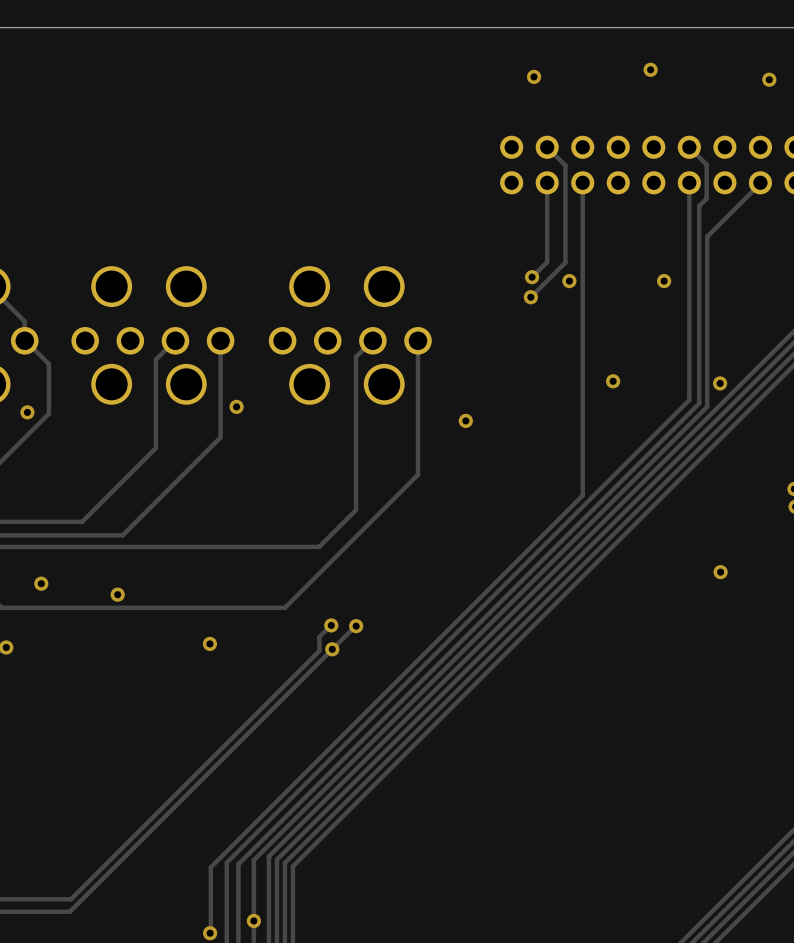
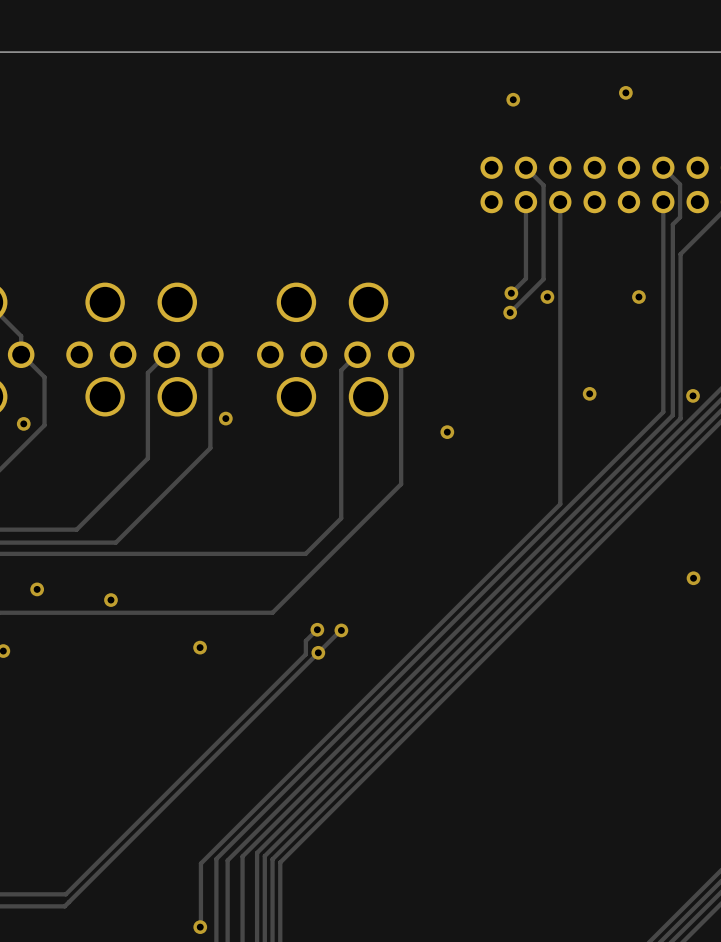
via: (253, 920) -> none

